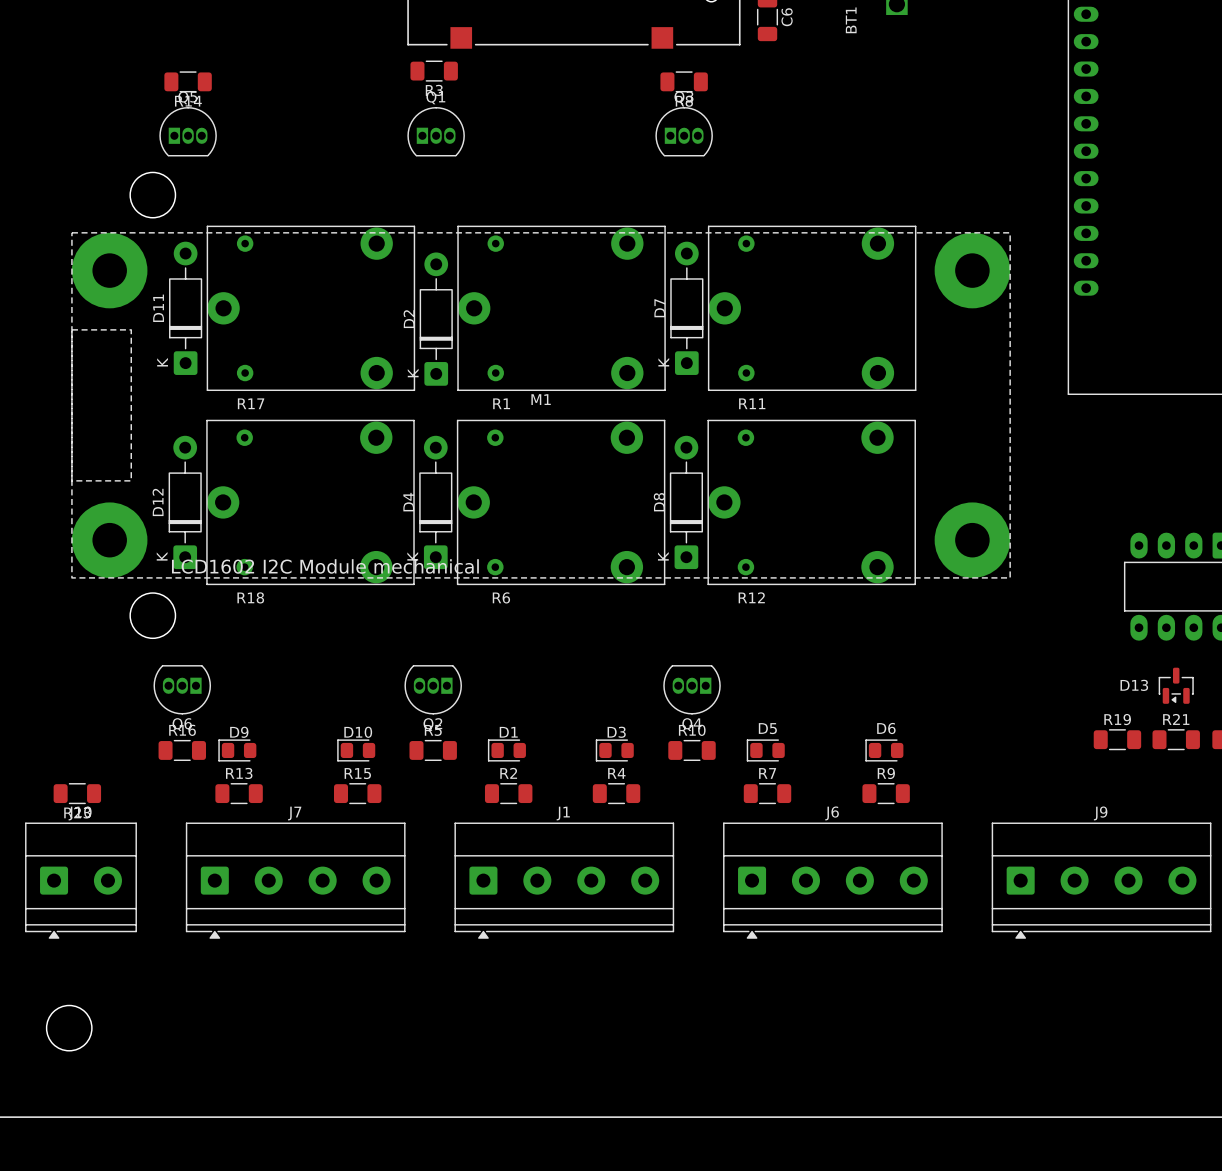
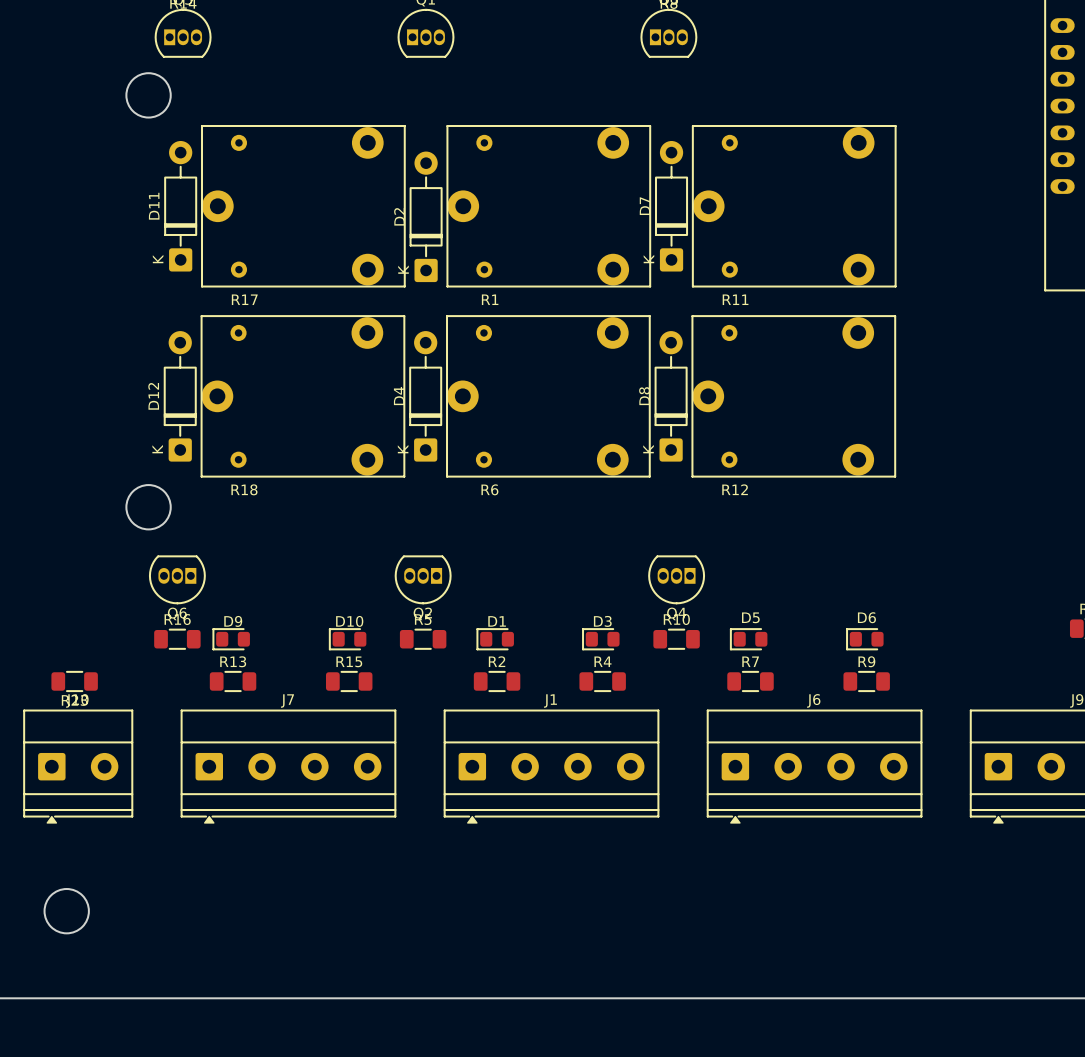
M1: (541, 405) -> none

